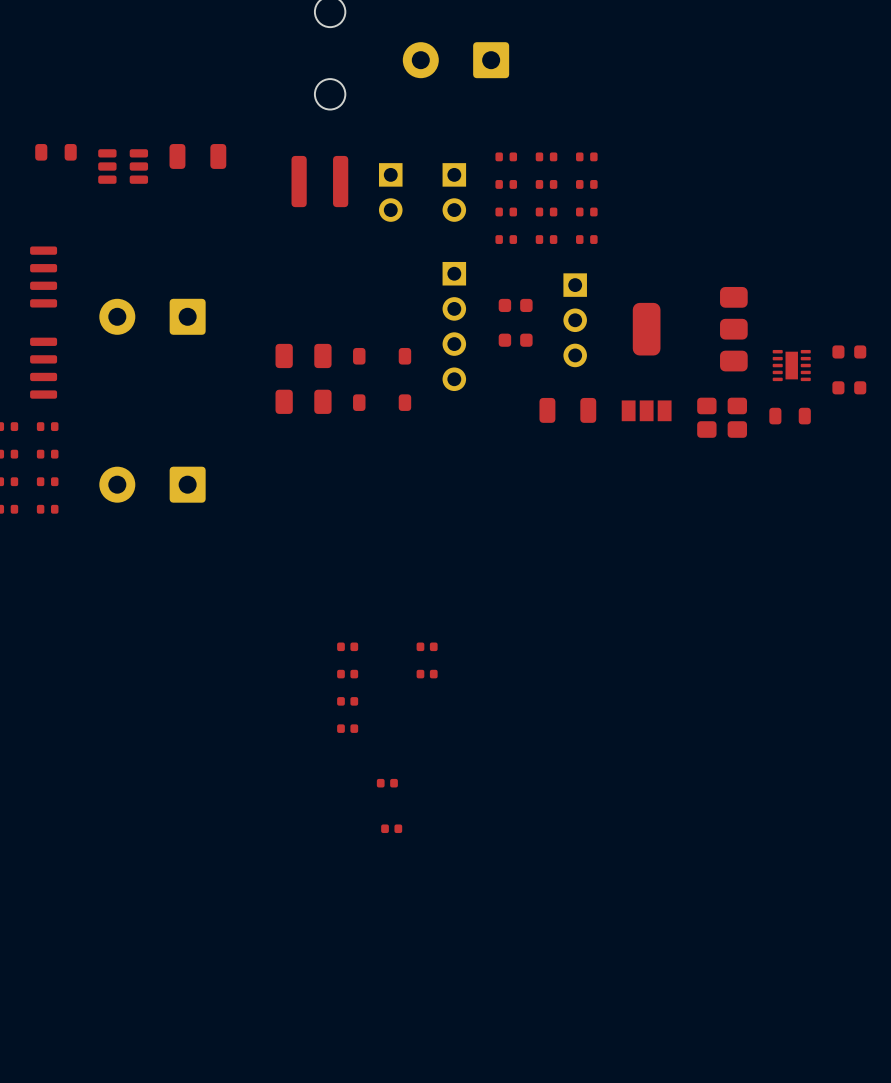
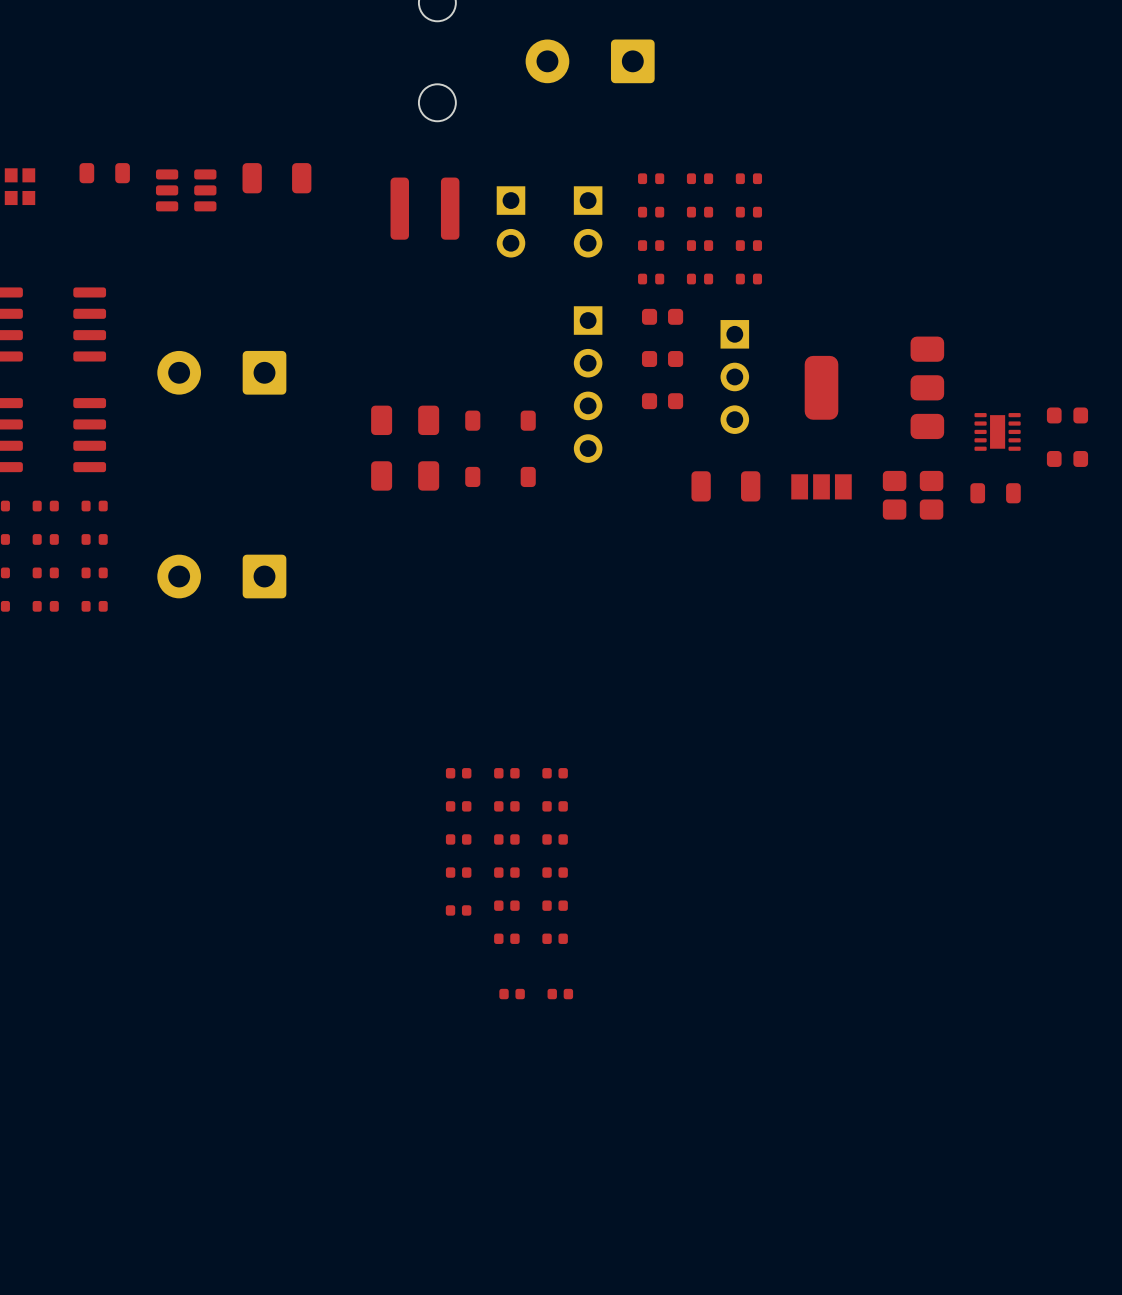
part: none -> (662, 316)
part: none -> (506, 773)
part: none -> (506, 806)
part: none -> (506, 839)
part: none -> (555, 839)
part: none -> (506, 872)
part: none -> (555, 872)
part: none -> (506, 905)
part: none -> (555, 905)
part: none -> (458, 910)
part: none -> (555, 938)
part: none -> (560, 994)

